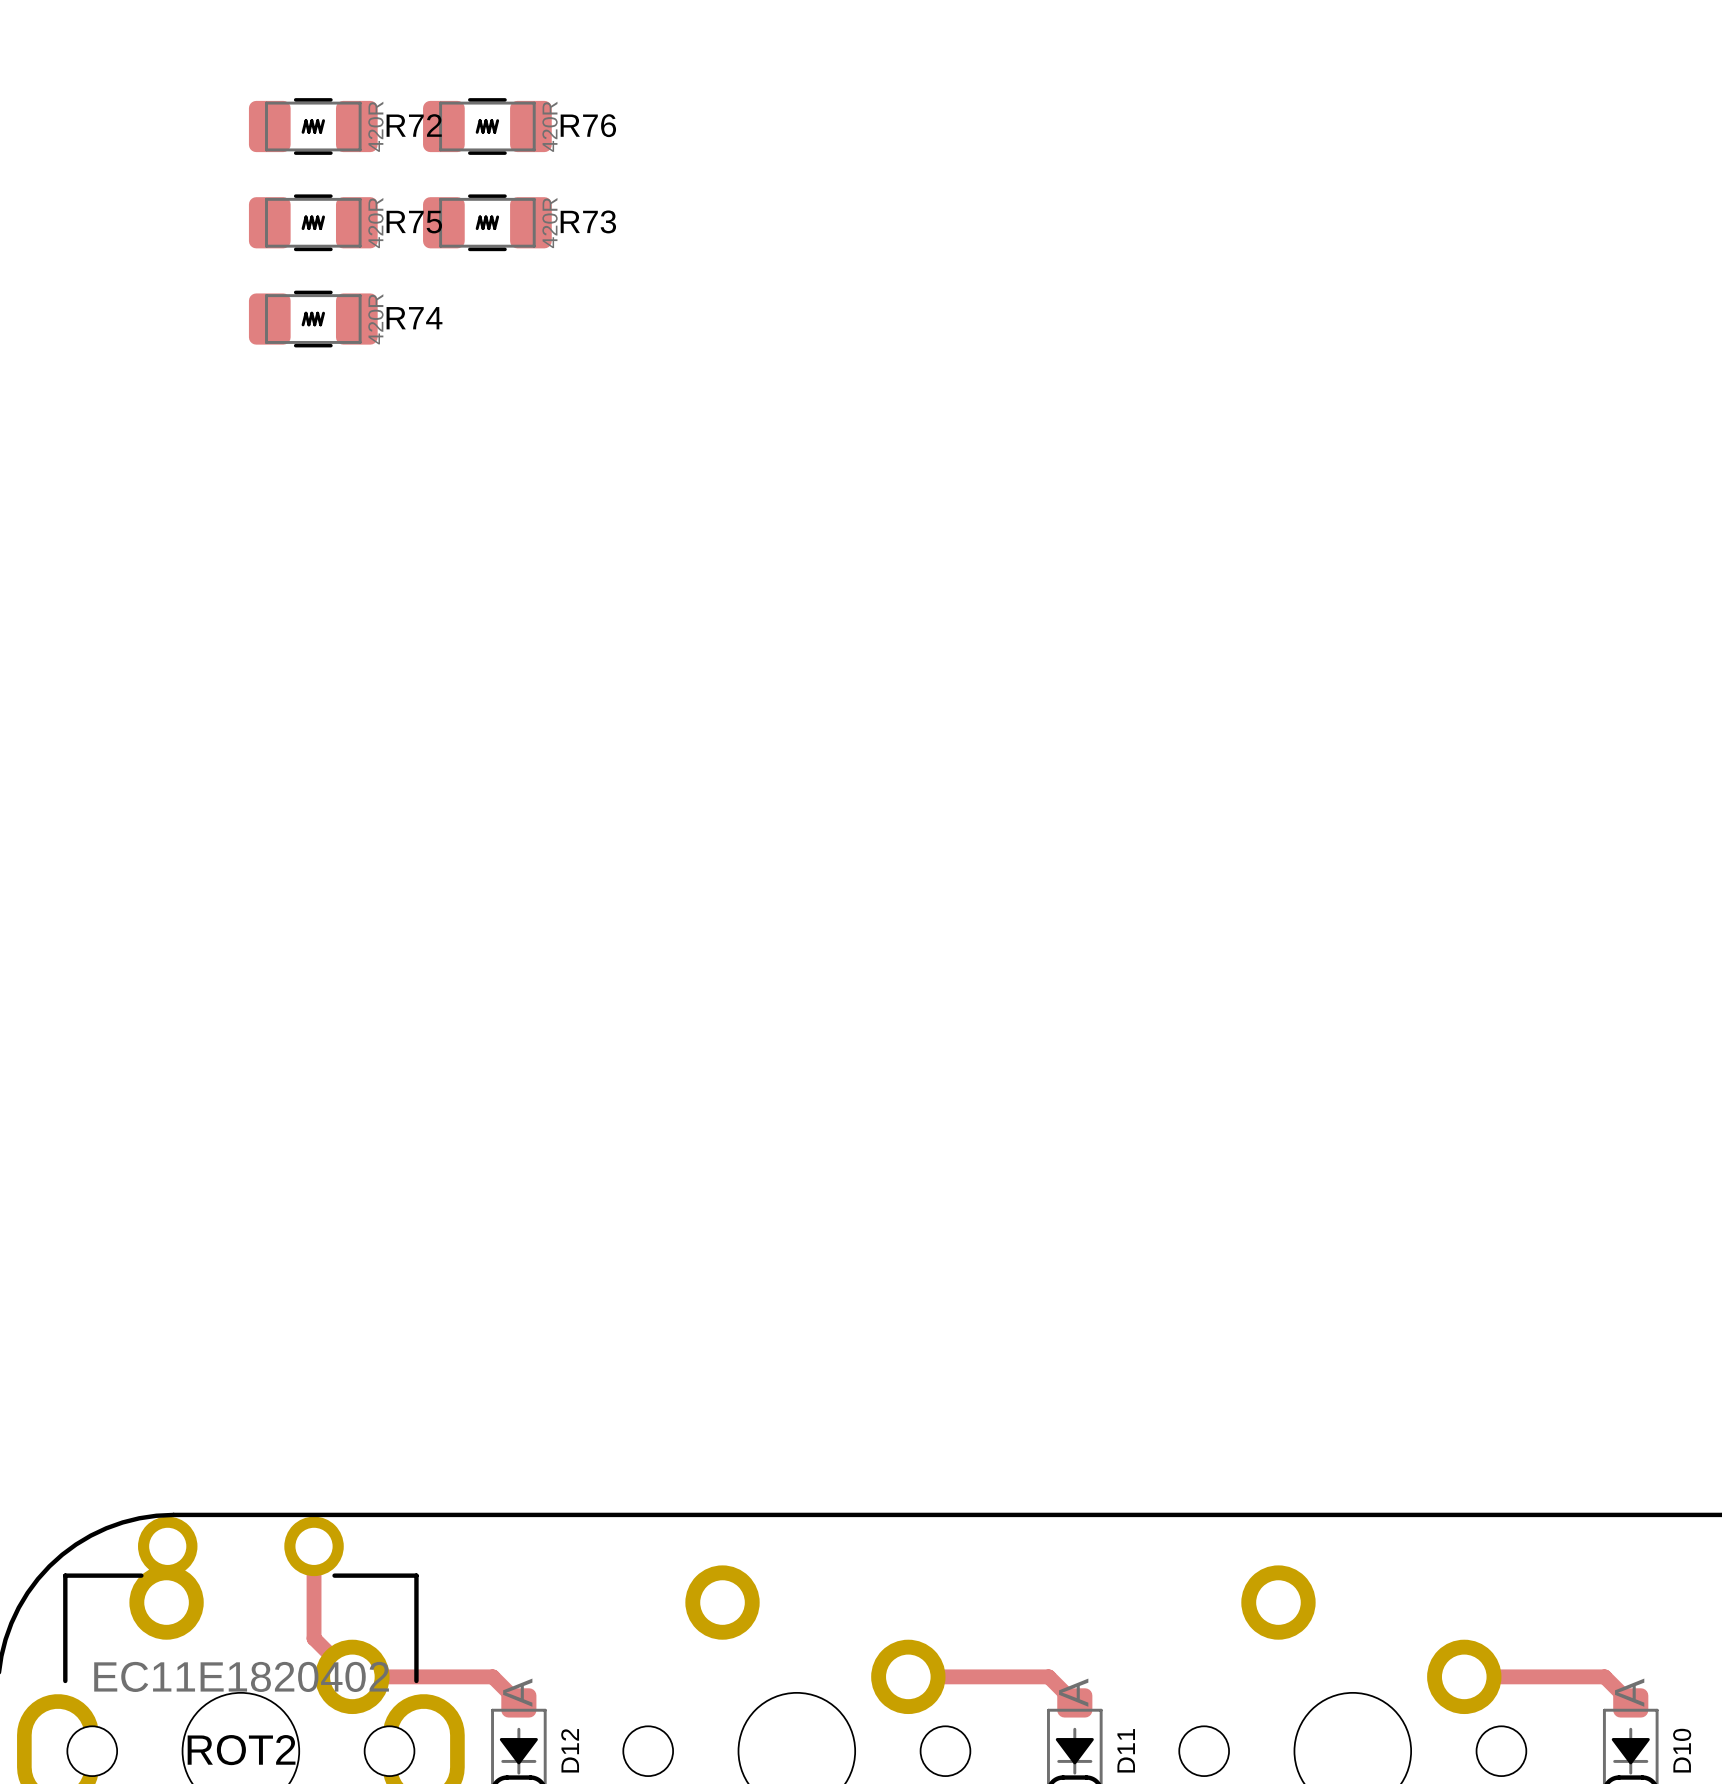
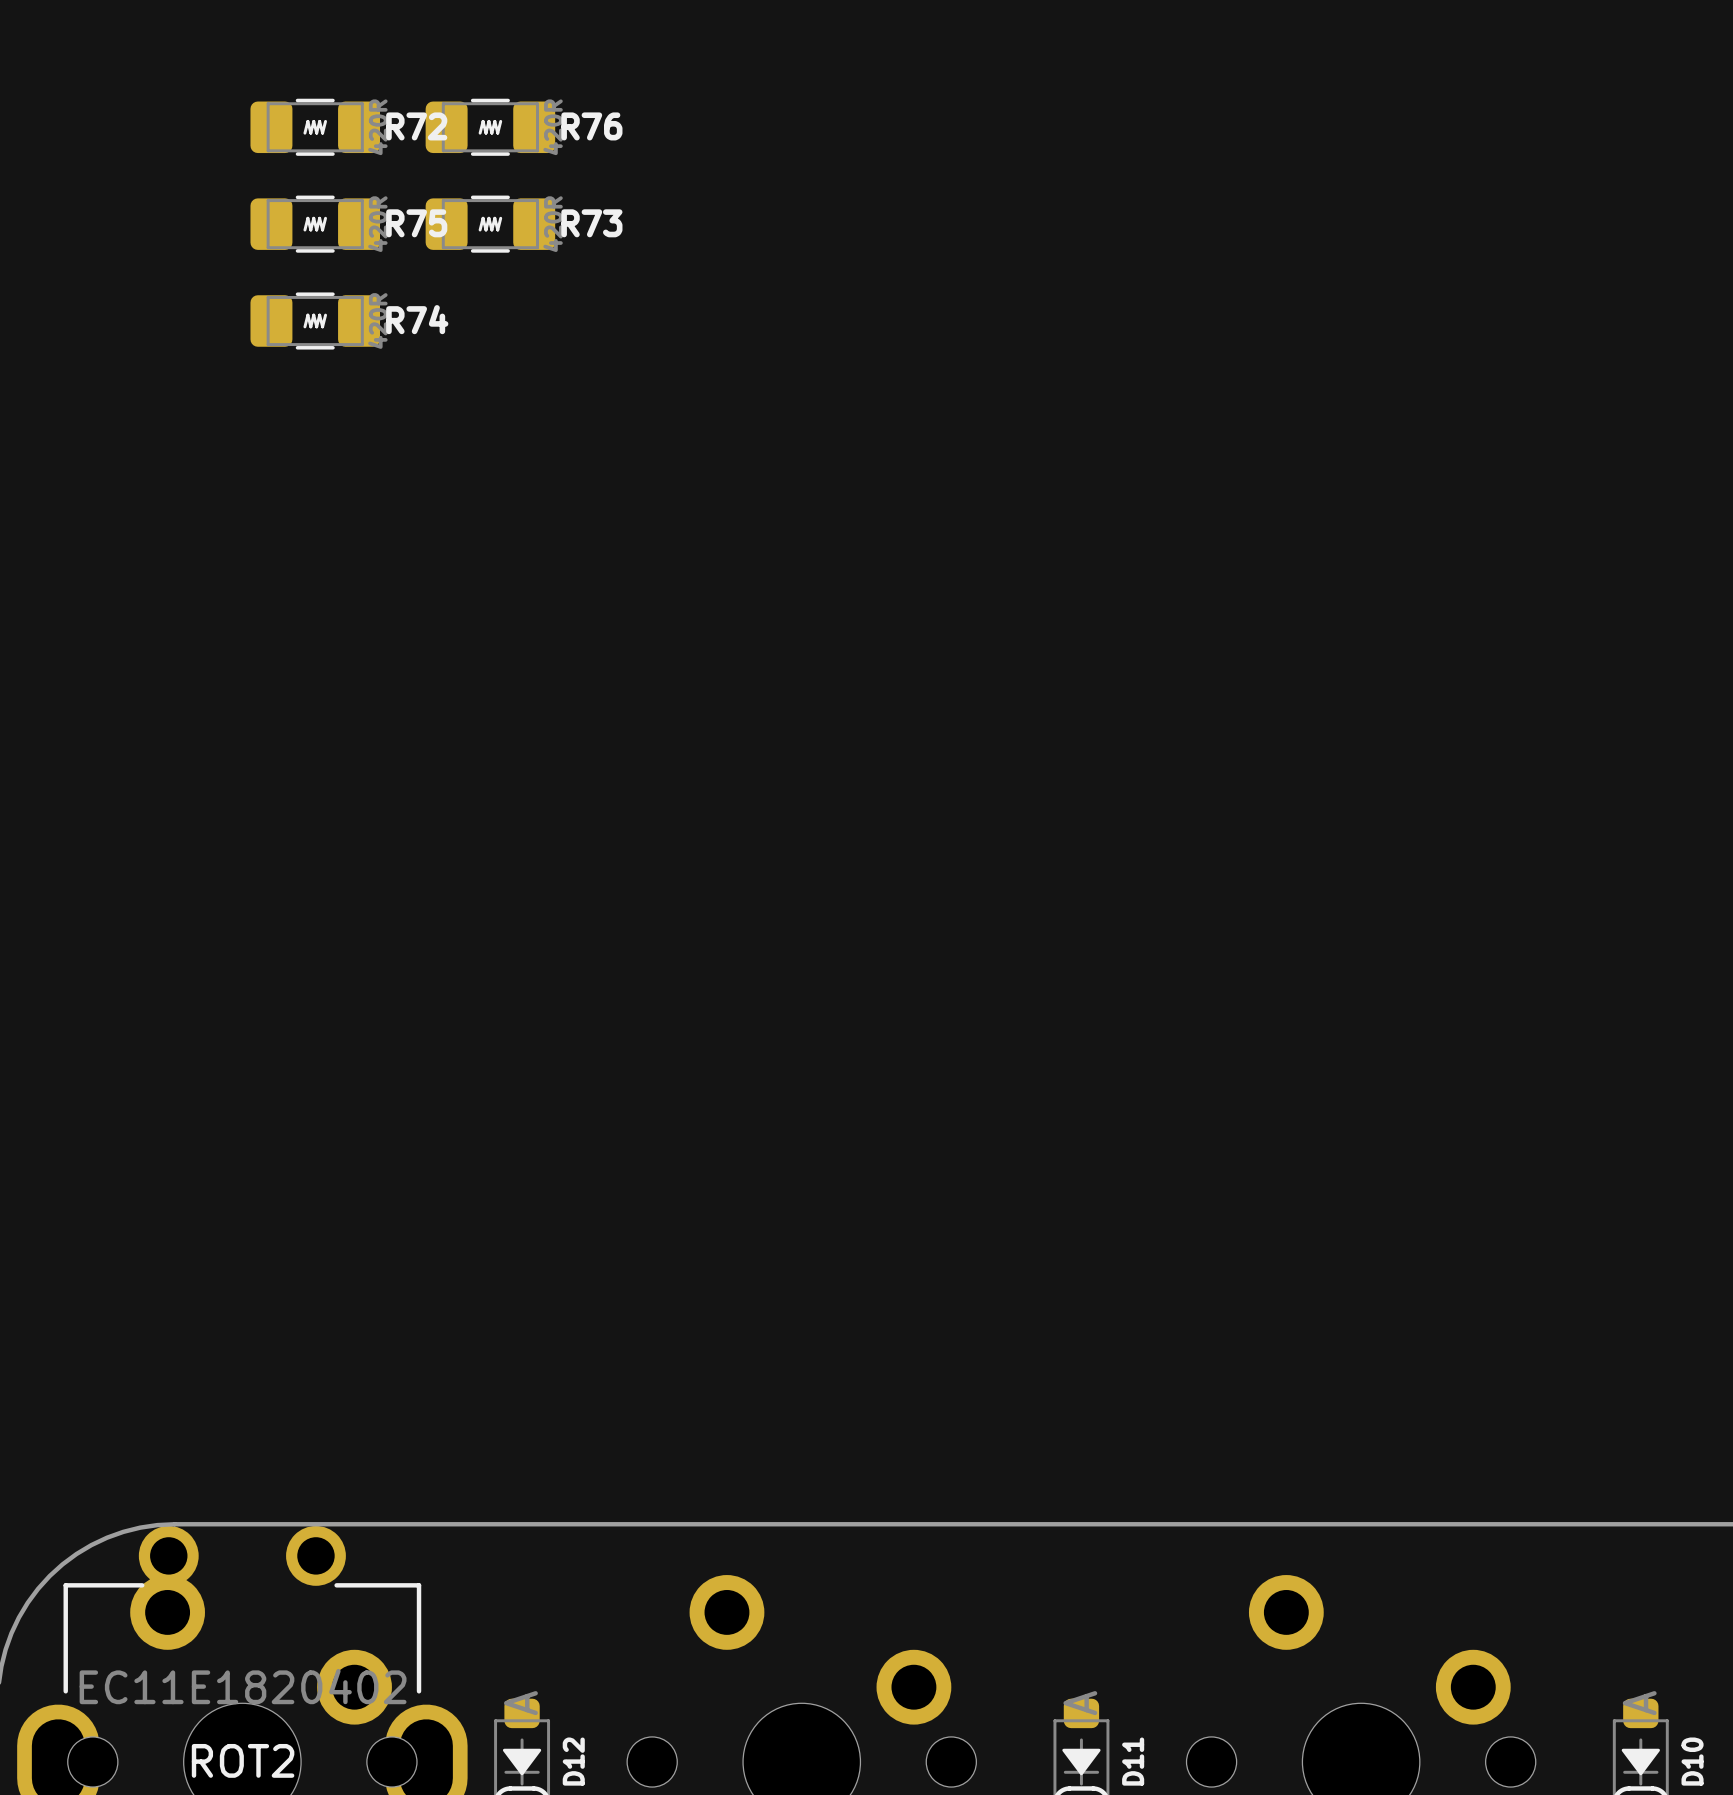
track: (314, 1546) (314, 1638) (352, 1676) (492, 1676) (518, 1702) -> none
track: (908, 1676) (1048, 1676) (1074, 1702) -> none
track: (1464, 1676) (1604, 1676) (1630, 1702) -> none

